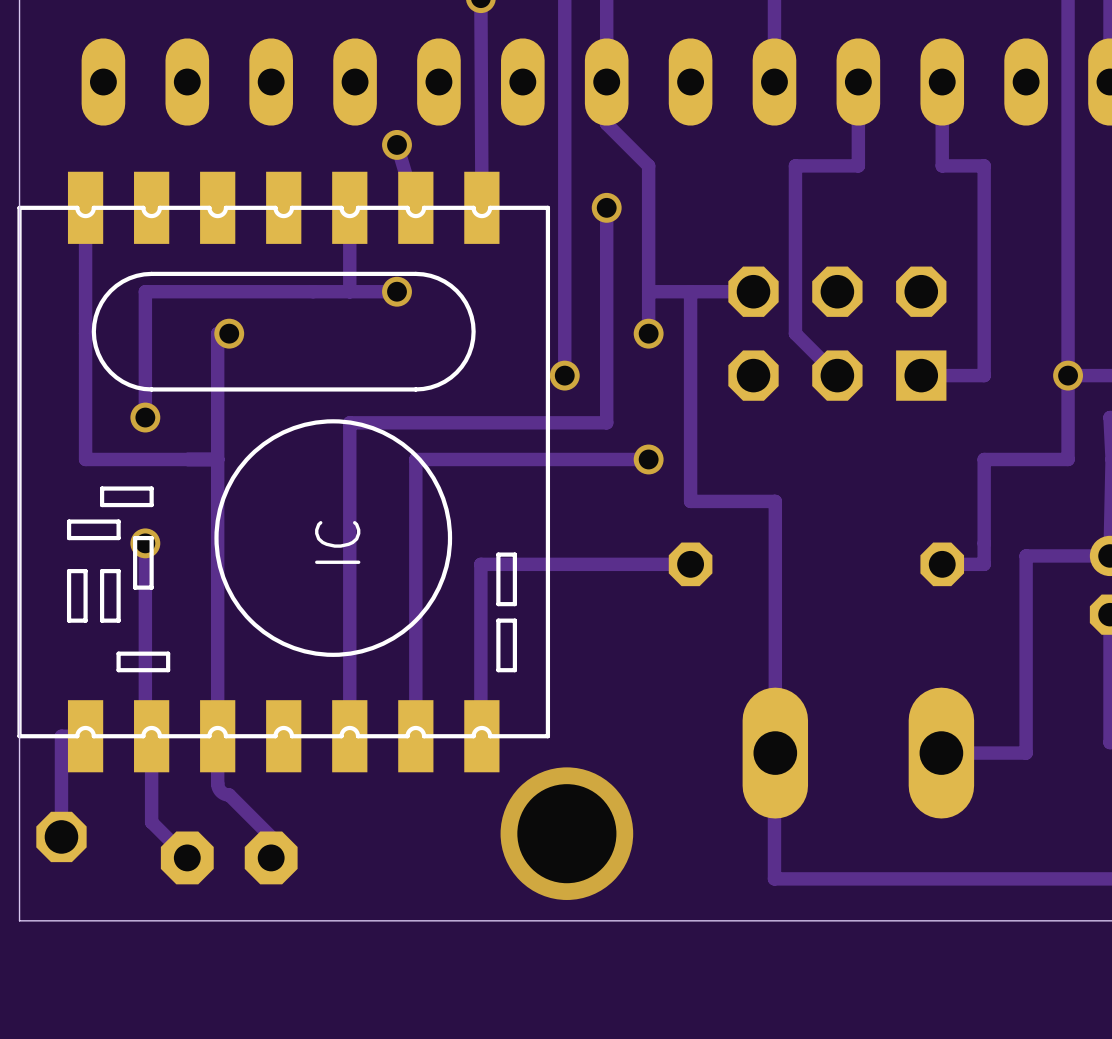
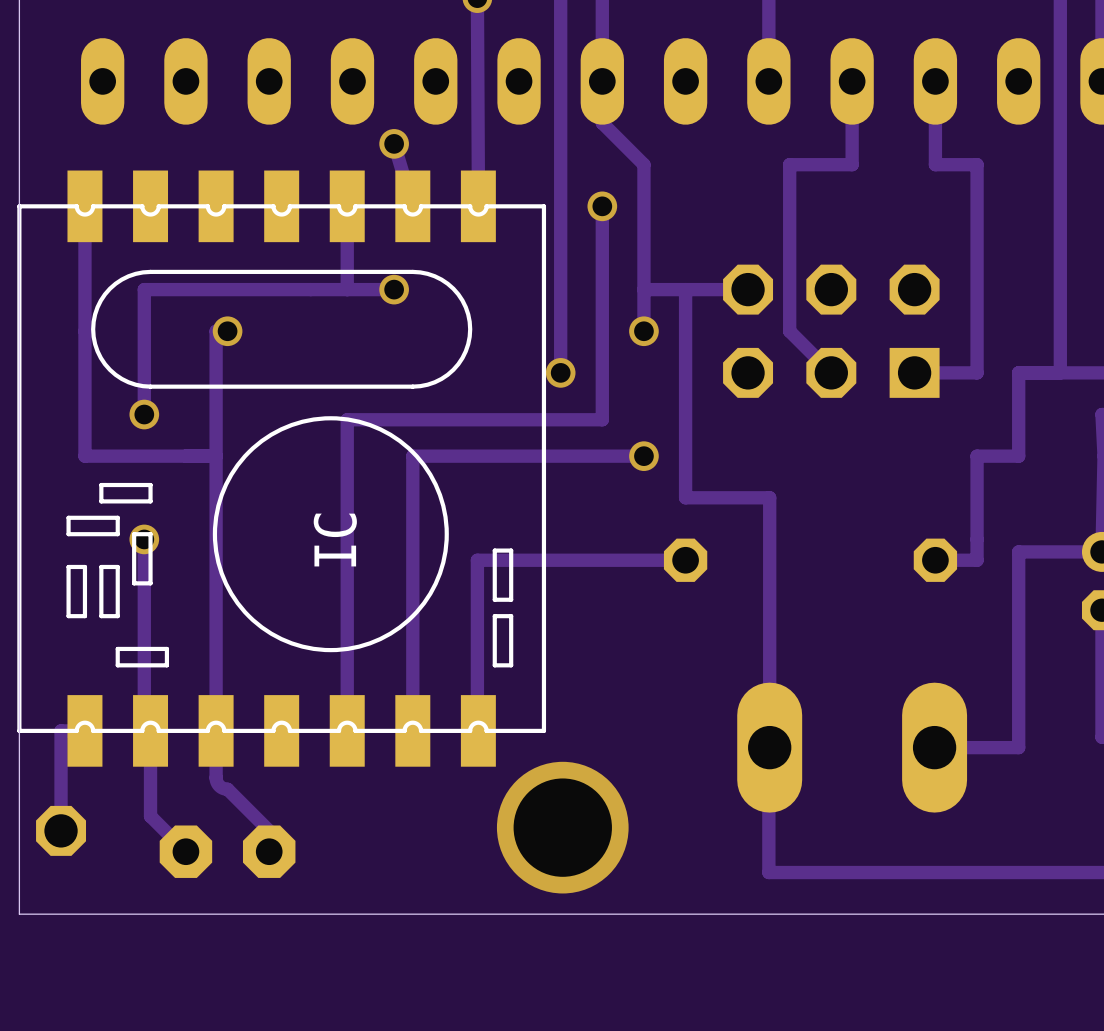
track: (1068, 375) (1068, 459) (1026, 459) -> (1060, 372) (1018, 372) (1018, 456)
via: (1068, 375) -> none

